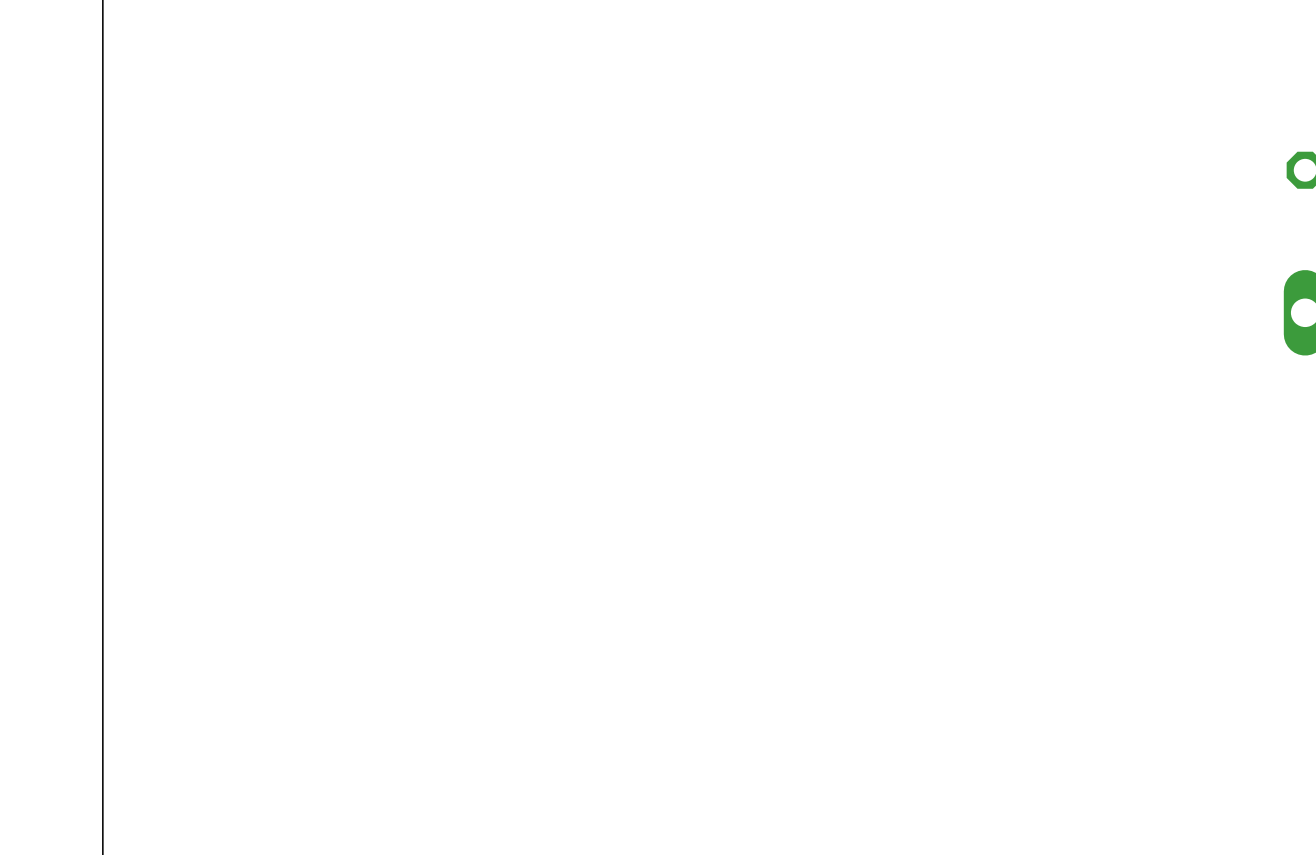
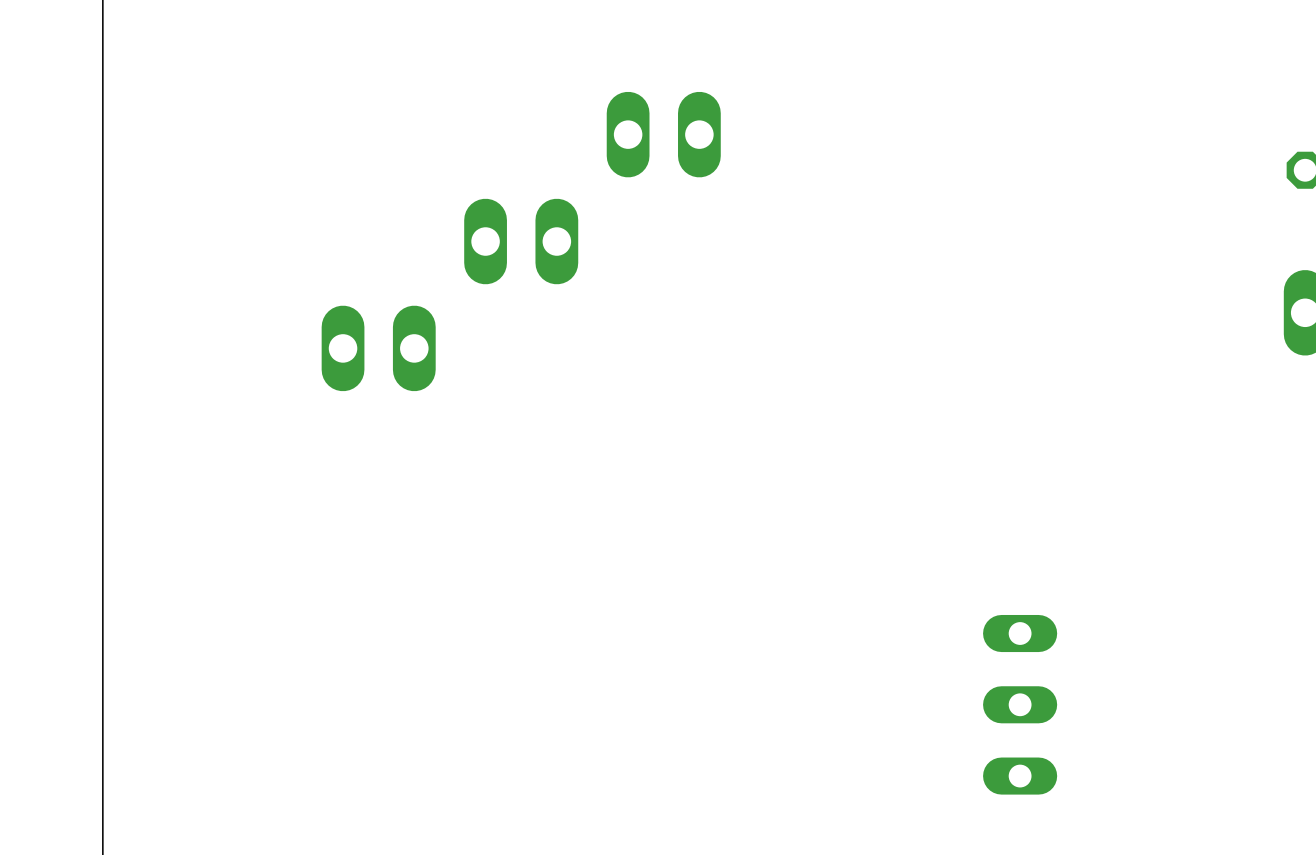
part: none -> (663, 134)
part: none -> (521, 241)
part: none -> (378, 348)
part: none -> (1020, 704)

